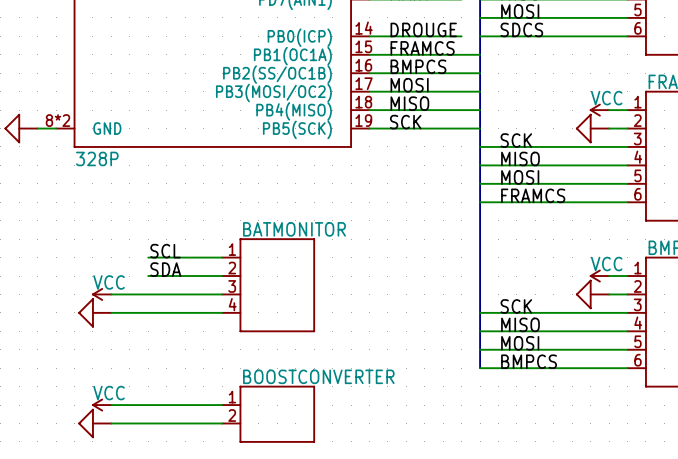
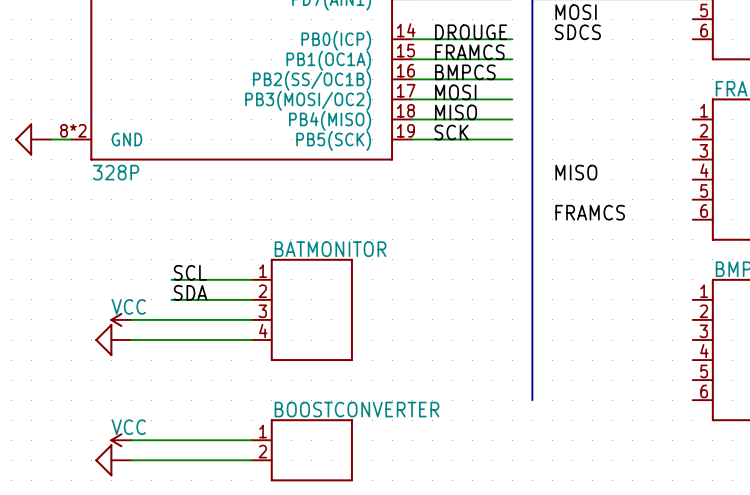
wire: (480, 17) (627, 17) -> none
wire: (480, 36) (627, 36) -> none
wire: (461, 54) (480, 54) -> none
wire: (461, 73) (480, 73) -> none
wire: (461, 91) (480, 91) -> none
wire: (461, 110) (480, 110) -> none
power symbol: VCC (599, 110) -> none
wire: (609, 110) (627, 110) -> none
wire: (461, 128) (480, 128) -> none
power symbol: (592, 128) -> none
wire: (609, 128) (627, 128) -> none
label: SCK (516, 140) -> none
wire: (480, 146) (627, 146) -> none
wire: (480, 165) (627, 165) -> none
label: MOSI (520, 177) -> none
wire: (480, 183) (627, 183) -> none
wire: (480, 202) (627, 202) -> none
power symbol: VCC (599, 276) -> none
wire: (609, 276) (627, 276) -> none
power symbol: (592, 294) -> none
wire: (609, 294) (627, 294) -> none
label: SCK (516, 306) -> none
wire: (480, 312) (627, 312) -> none
label: MISO (520, 324) -> none
wire: (480, 331) (627, 331) -> none
label: MOSI (520, 343) -> none
wire: (480, 349) (627, 349) -> none
label: BMPCS (529, 361) -> none
wire: (480, 368) (627, 368) -> none

